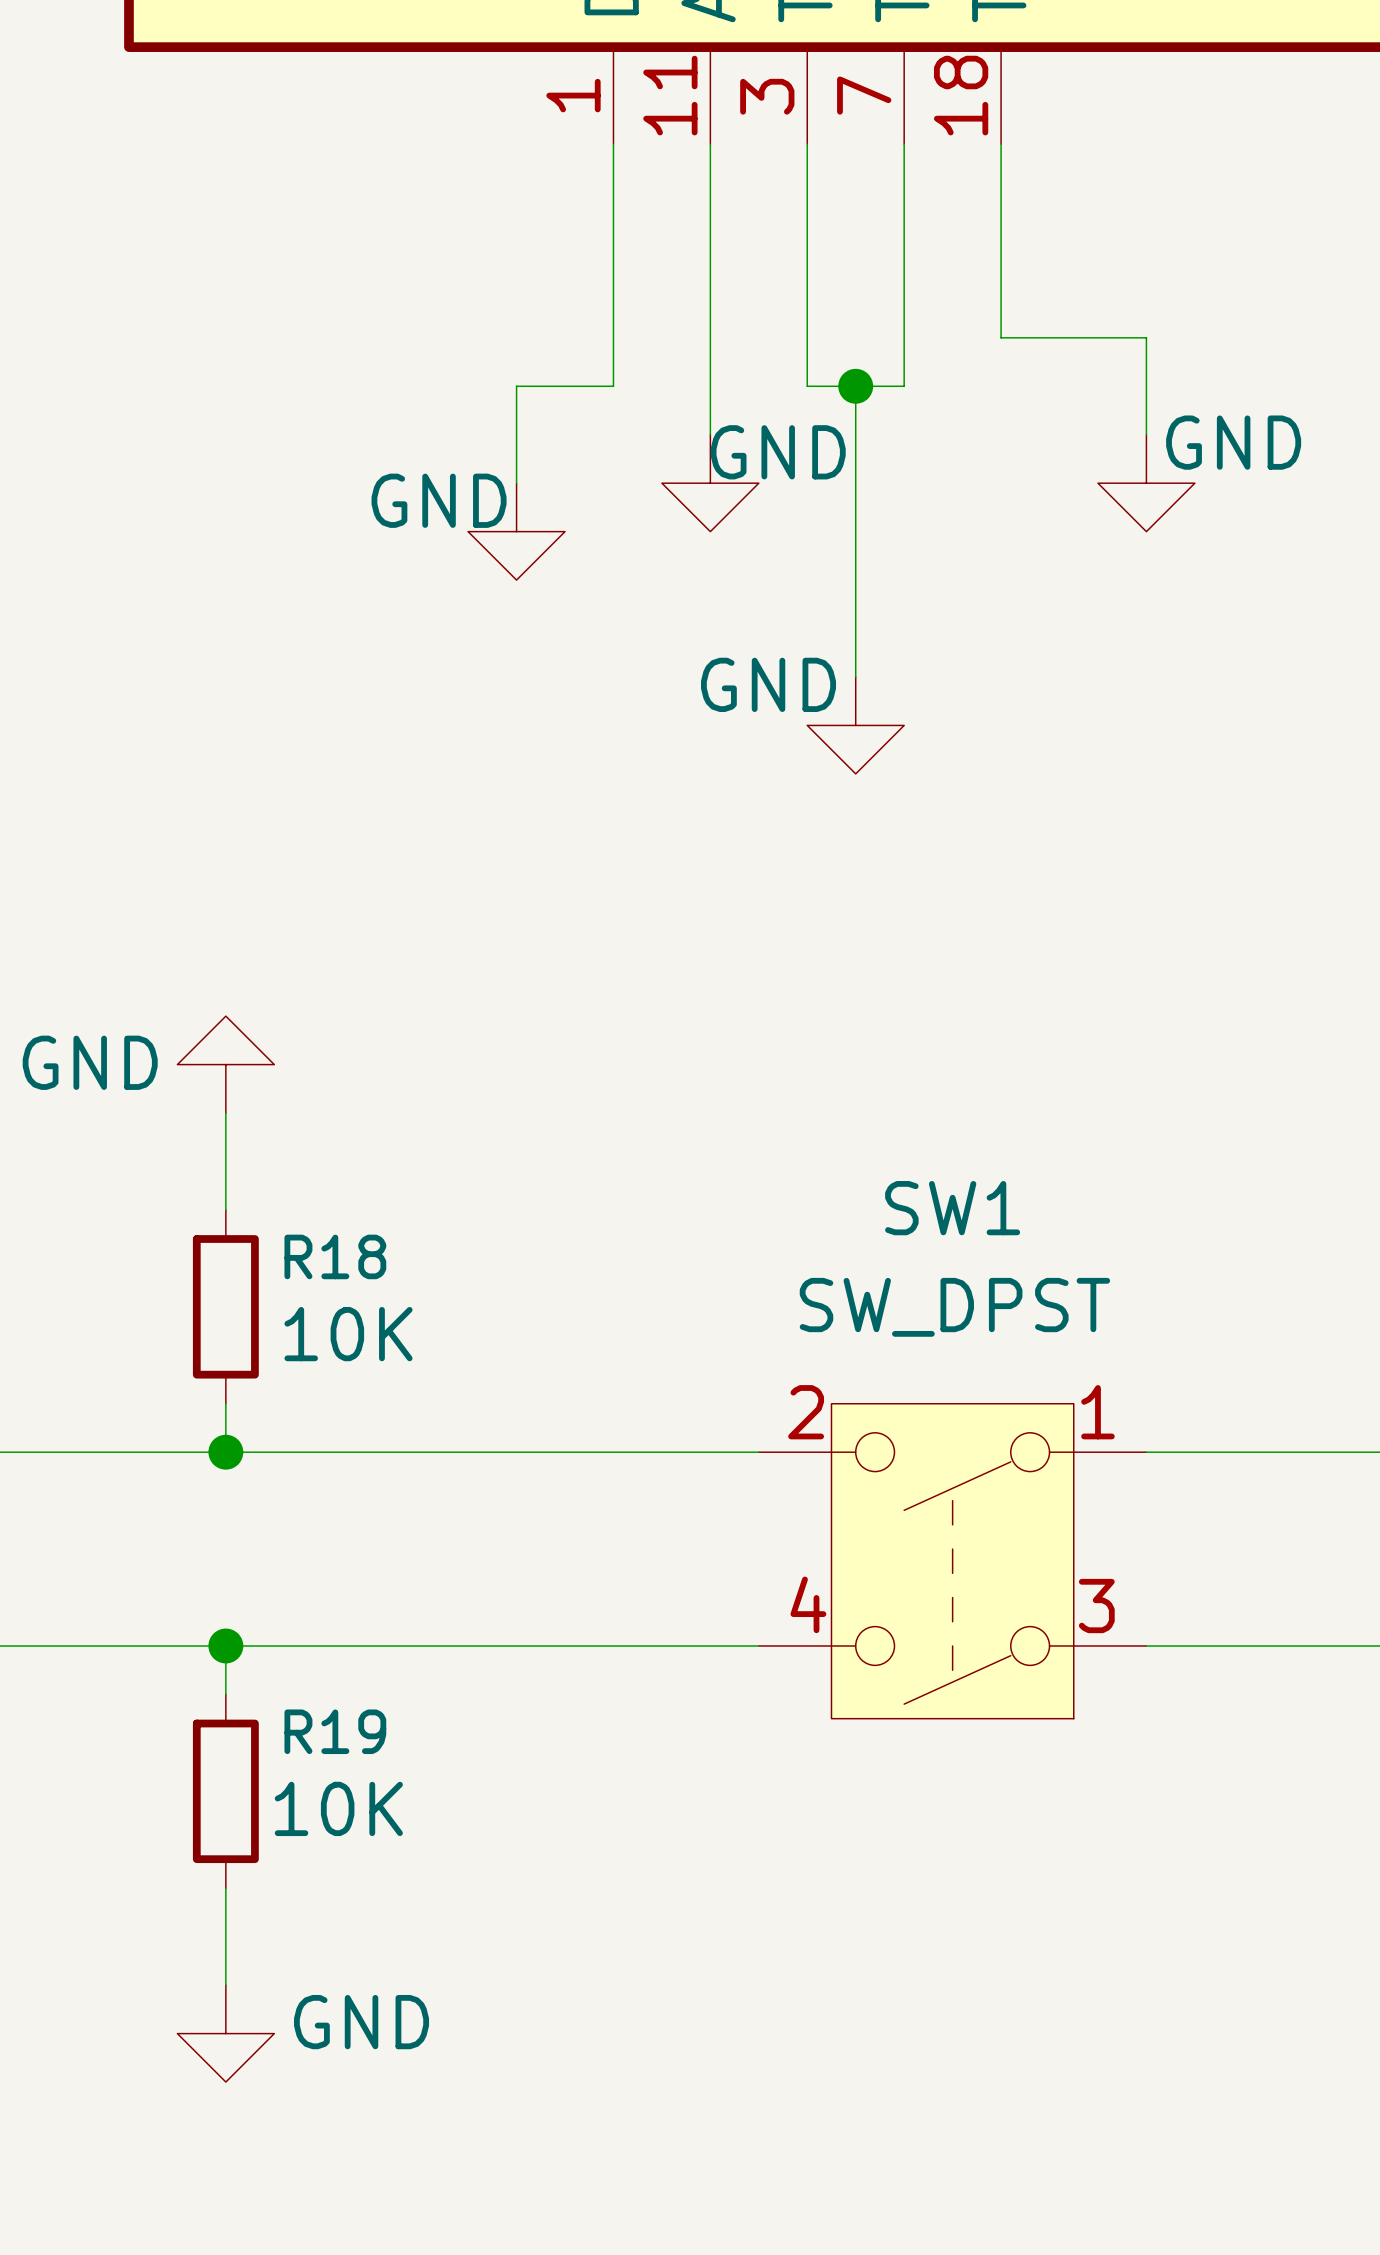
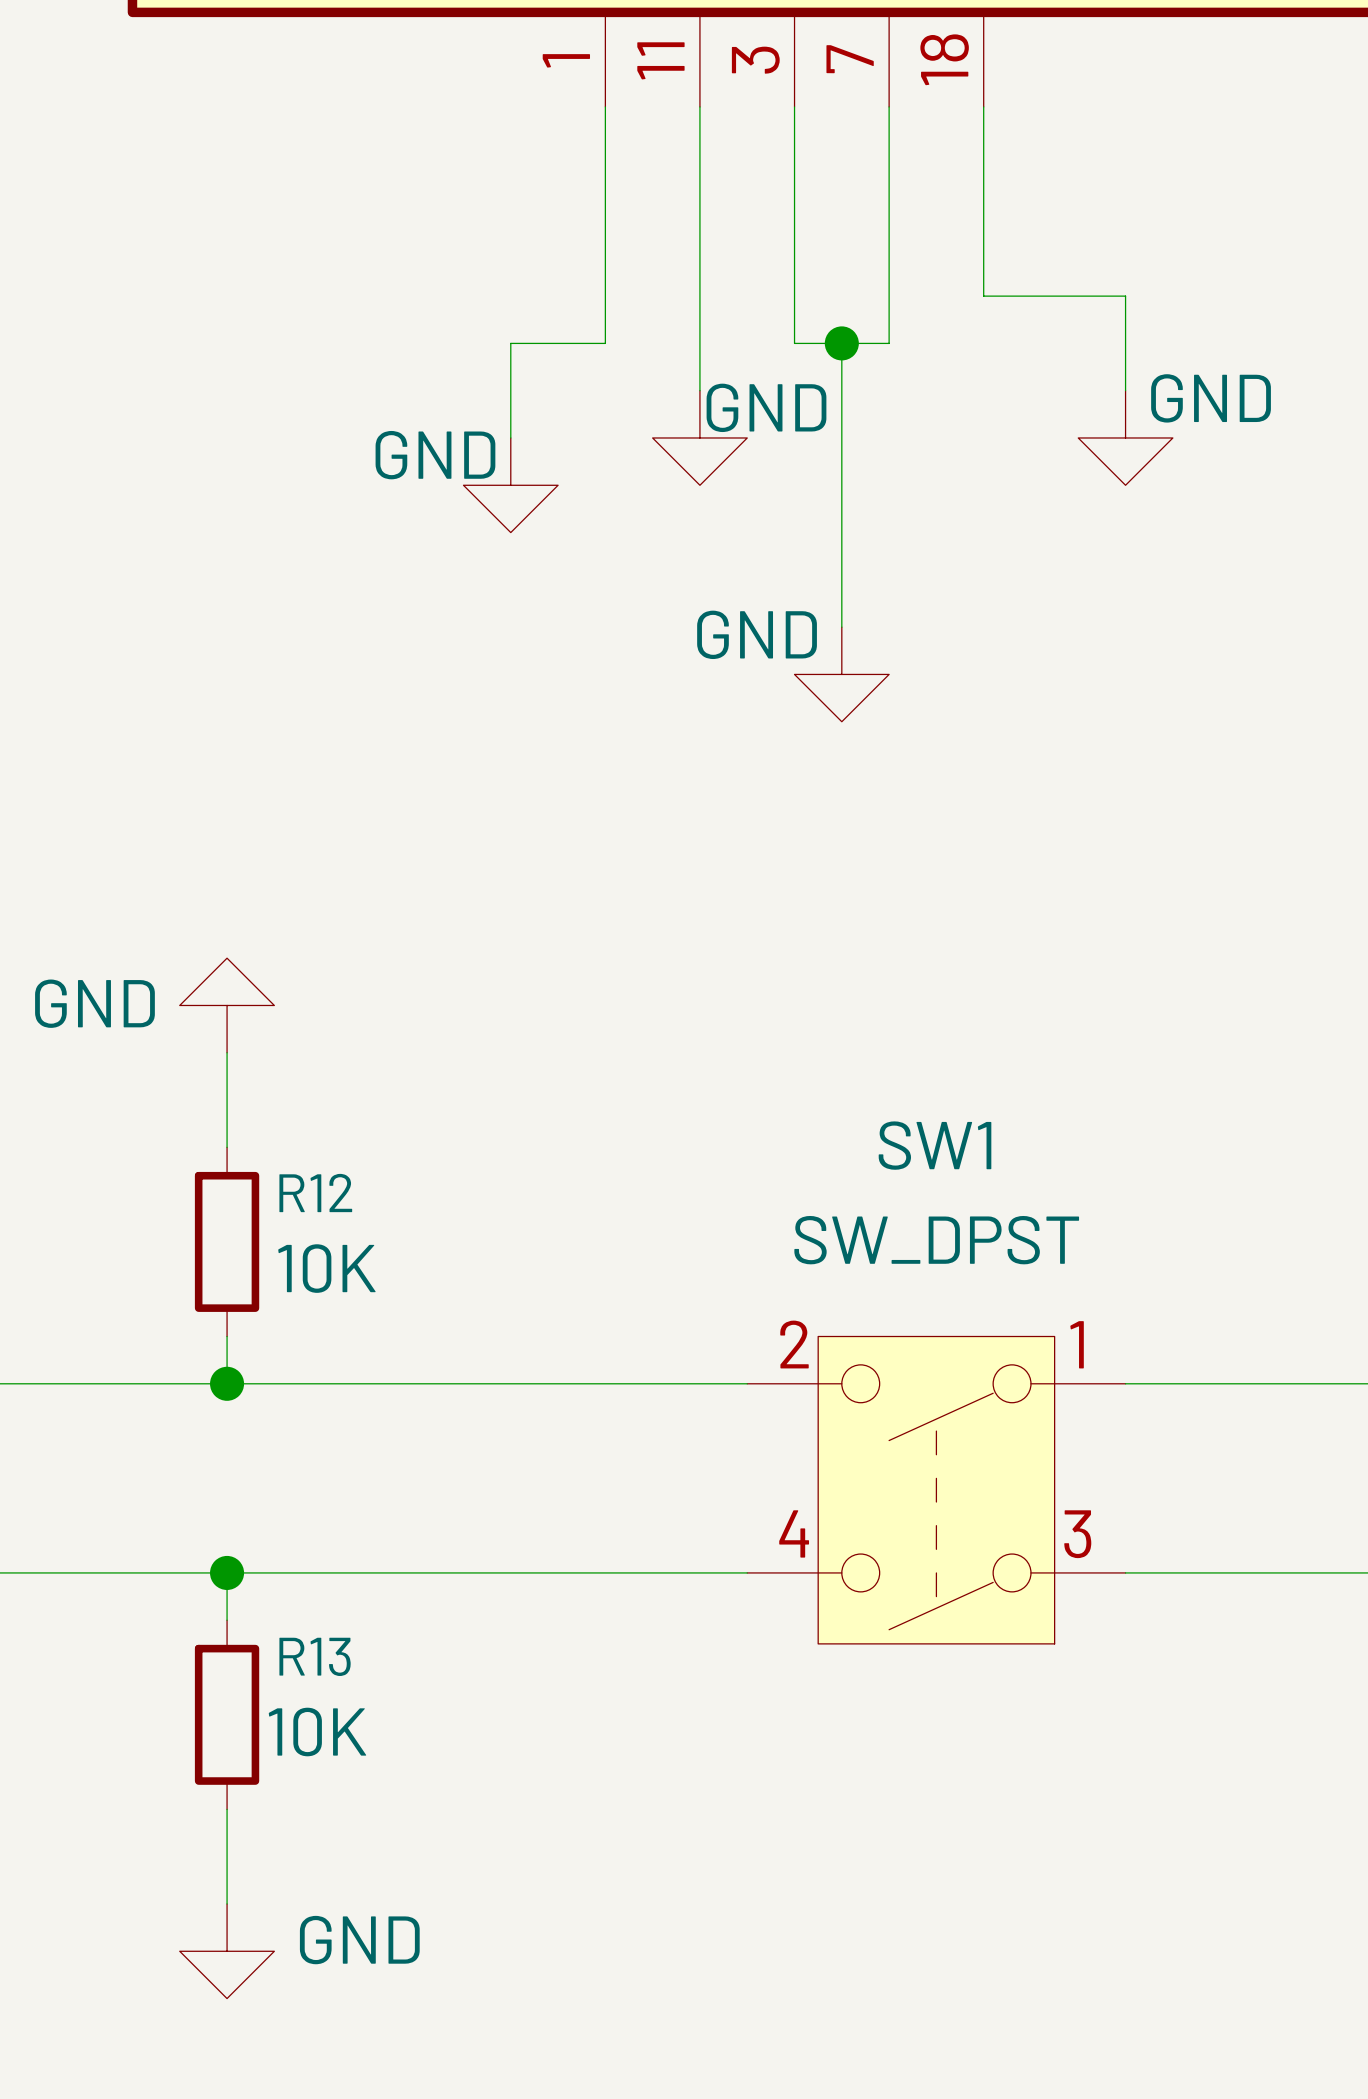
R18 name: R18 (335, 1256) -> R12 (315, 1193)
R19 name: R19 (335, 1731) -> R13 (315, 1656)

